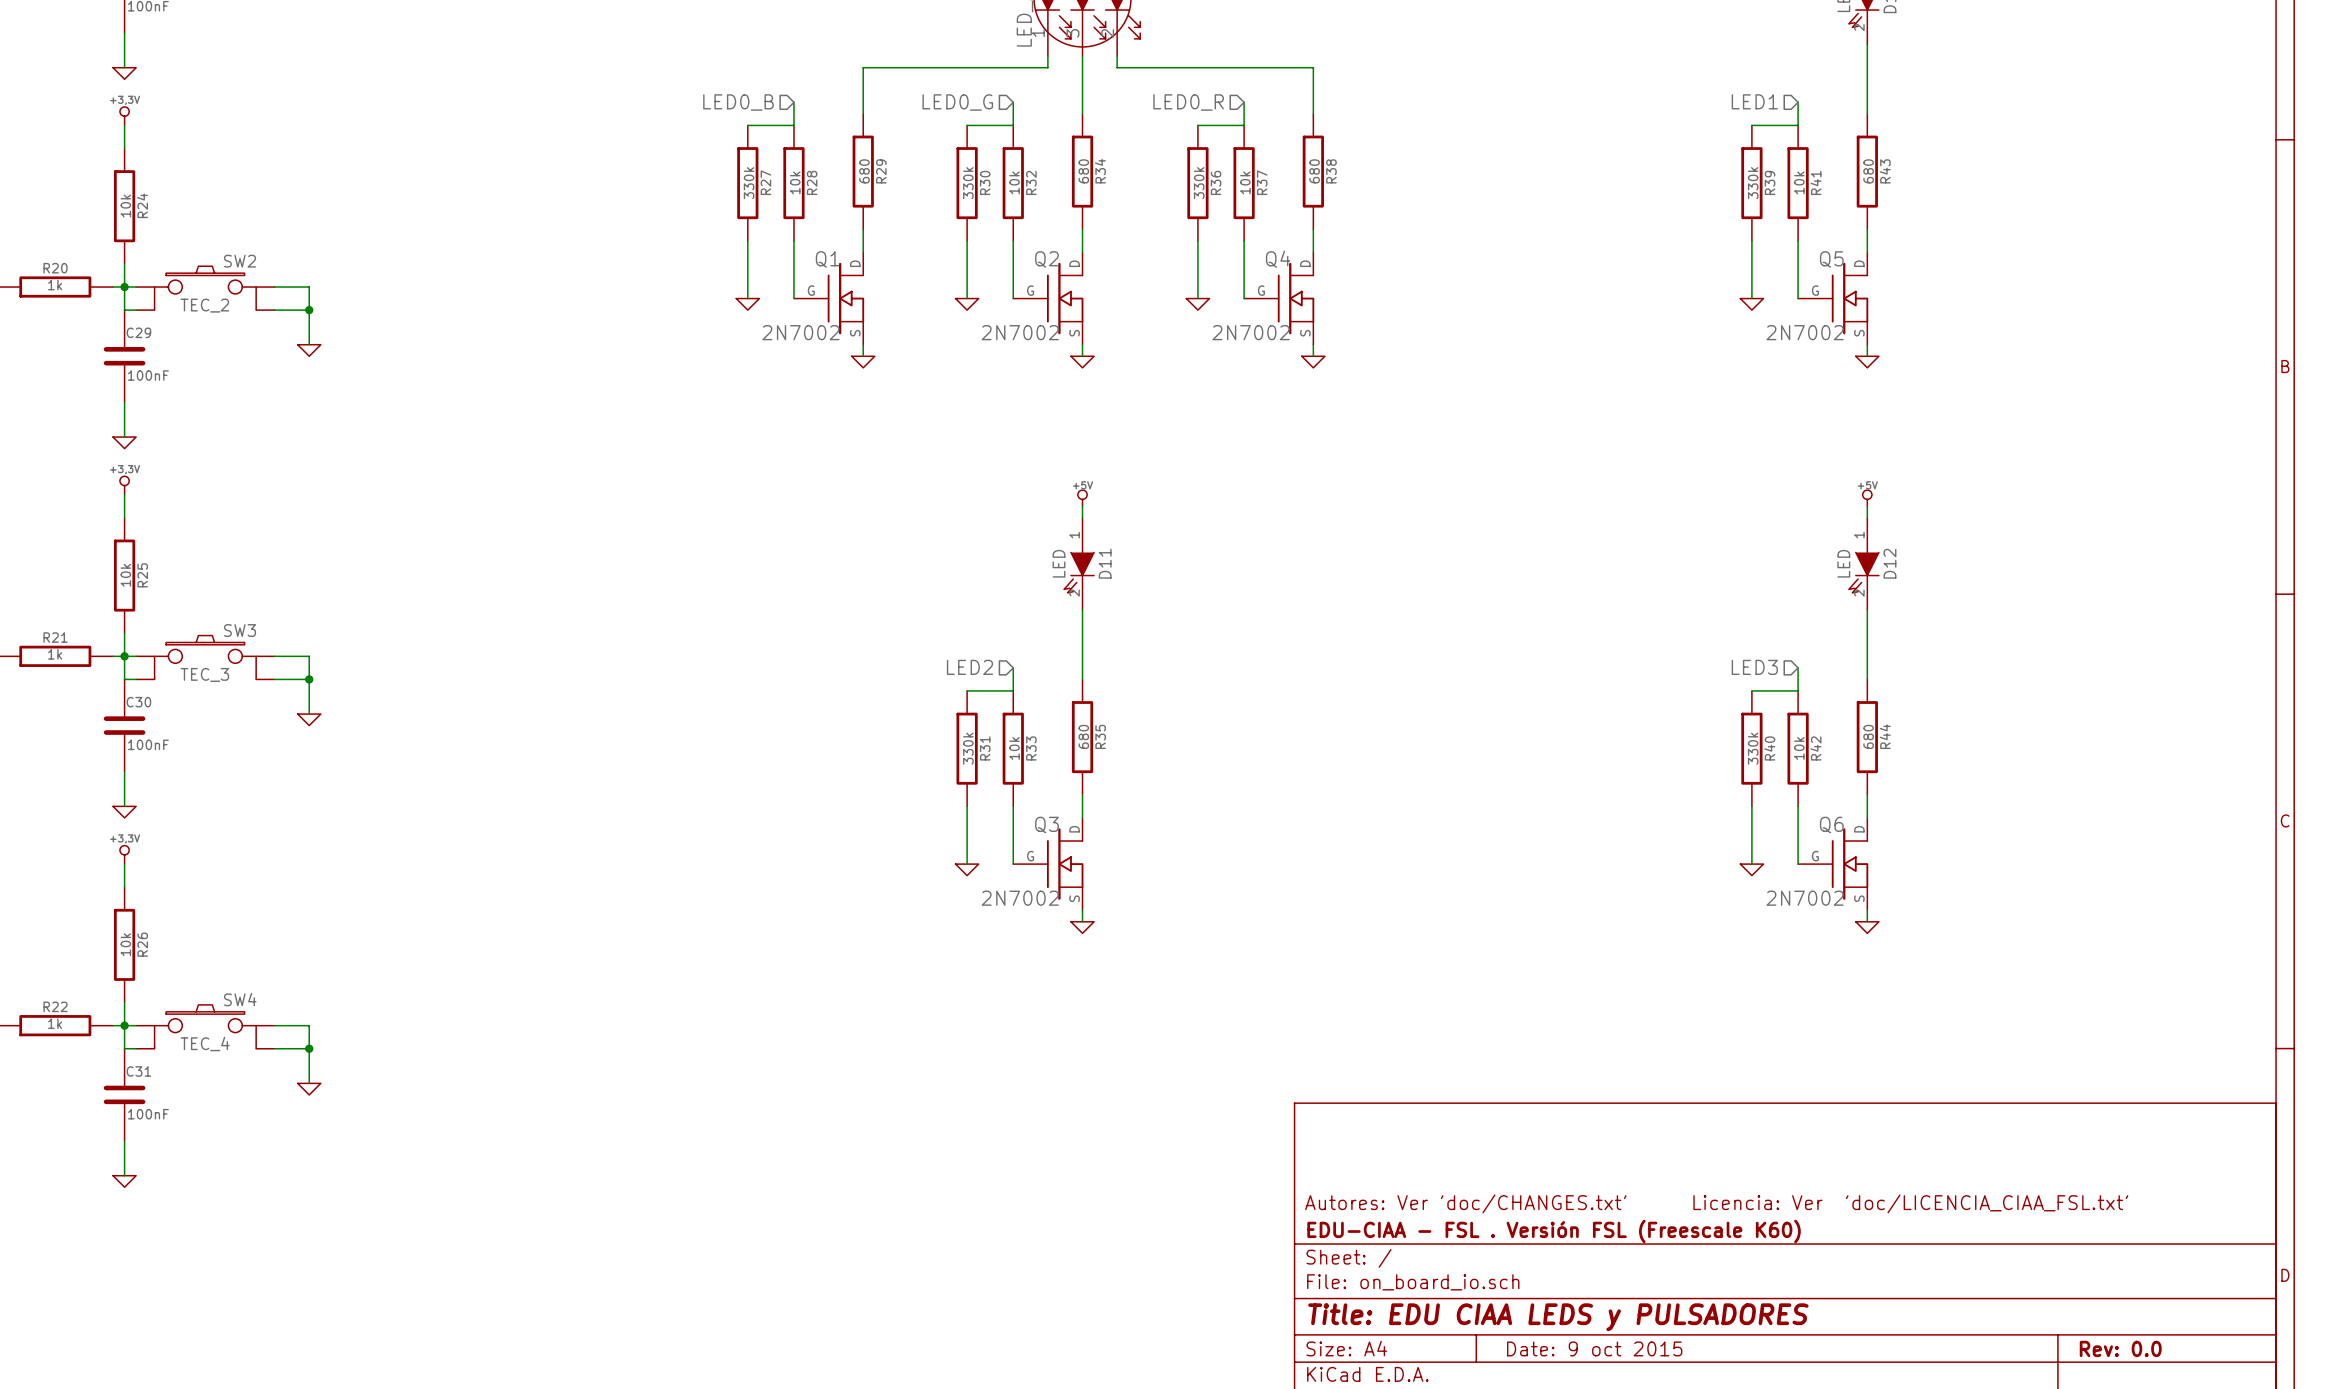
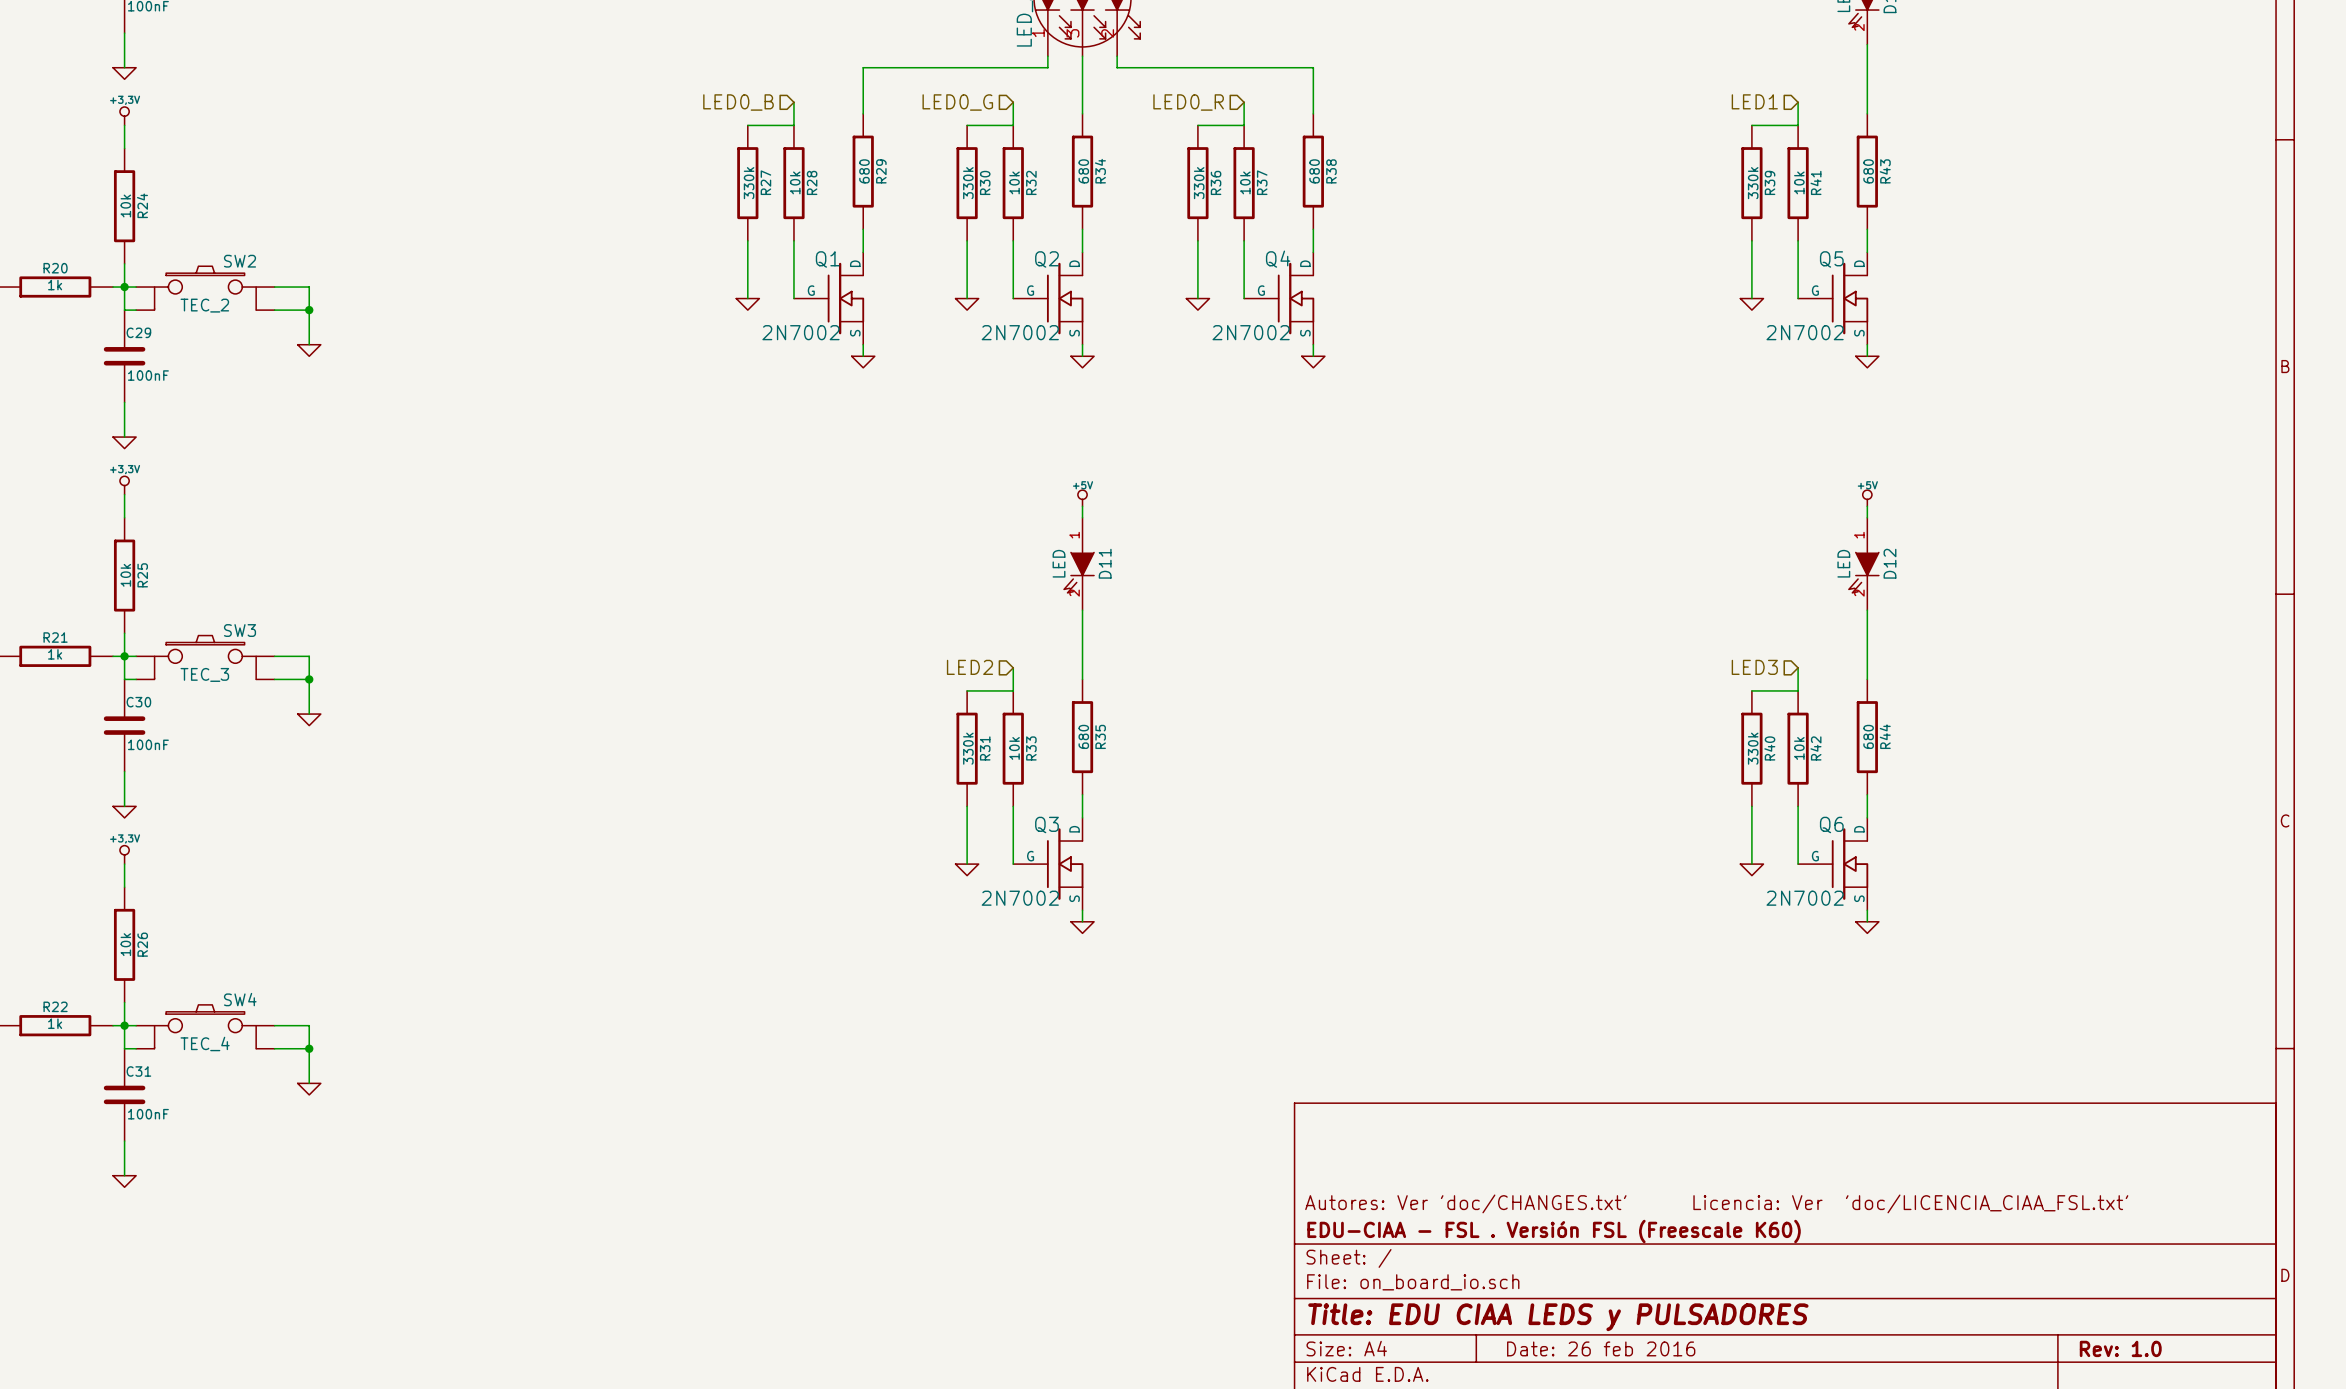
title block: Date: 9 oct 2015 (1594, 1348) -> Date: 26 feb 2016 (1601, 1348)
title block: Rev: 0.0 (2120, 1348) -> Rev: 1.0 (2120, 1348)

